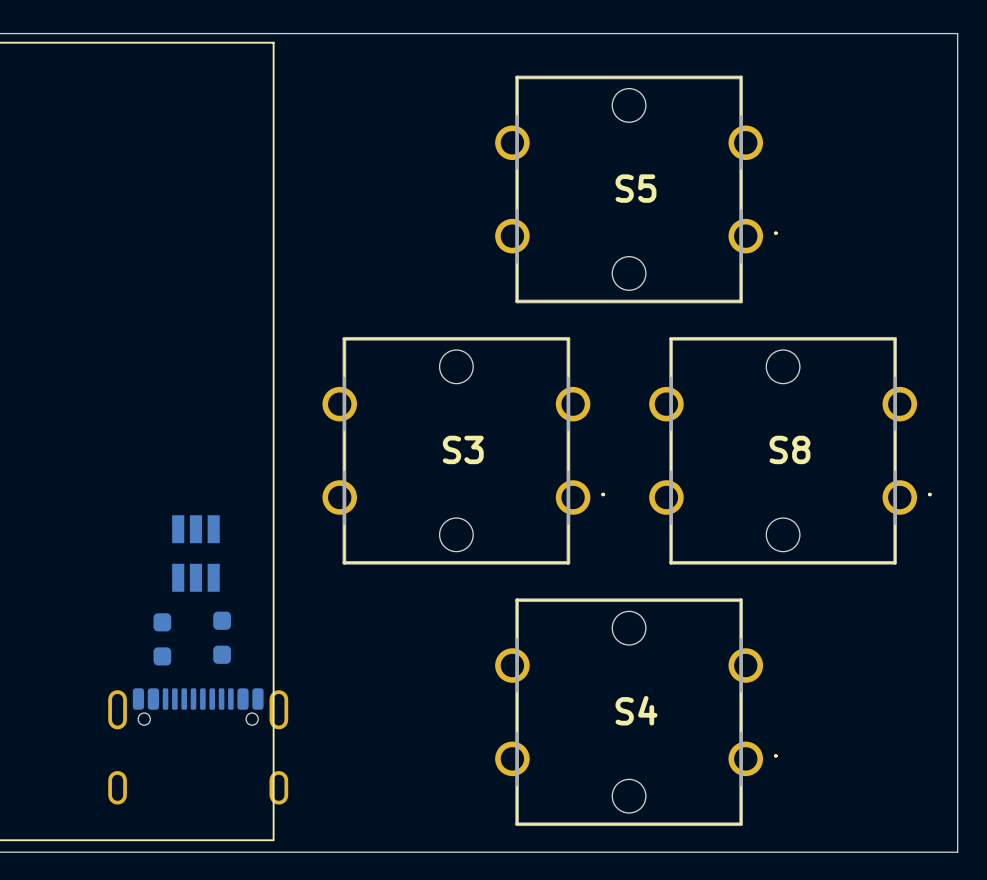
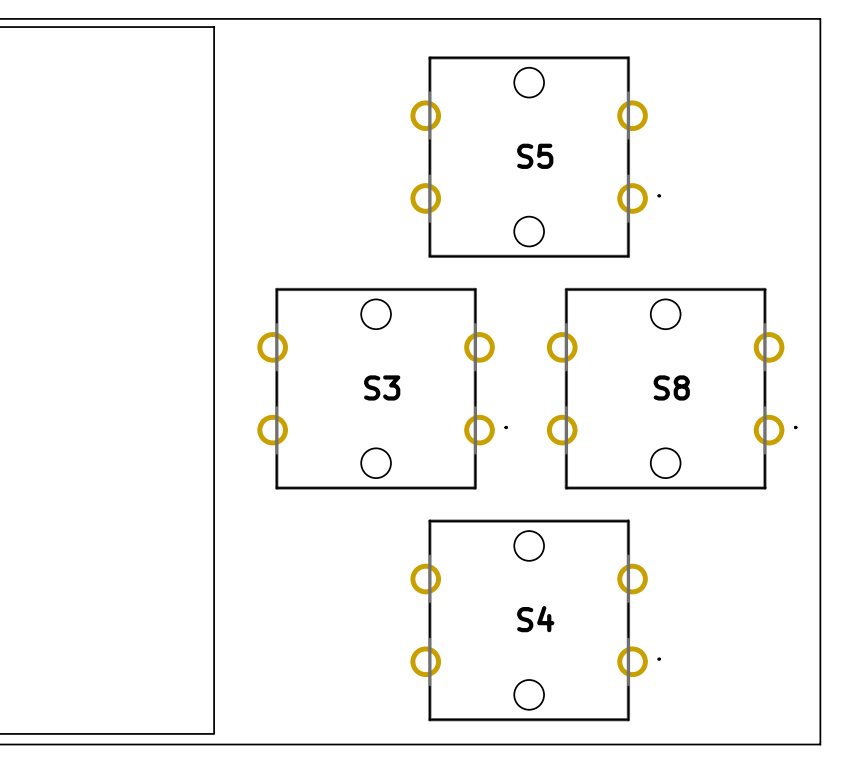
part: (195, 553) -> none
part: (222, 637) -> none
part: (162, 639) -> none
part: (198, 746) -> none

